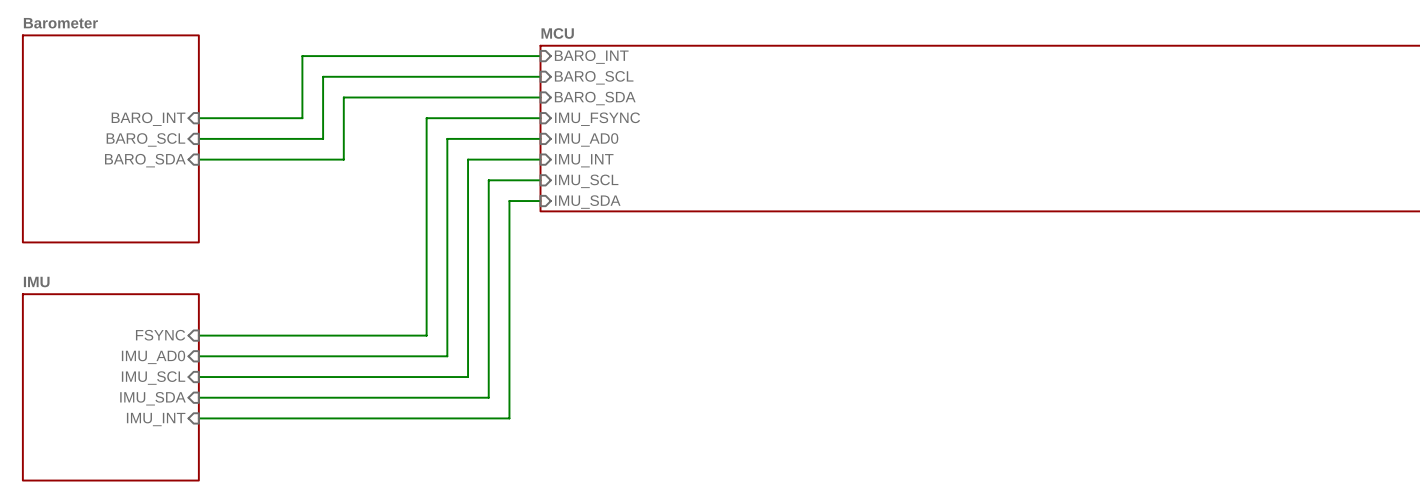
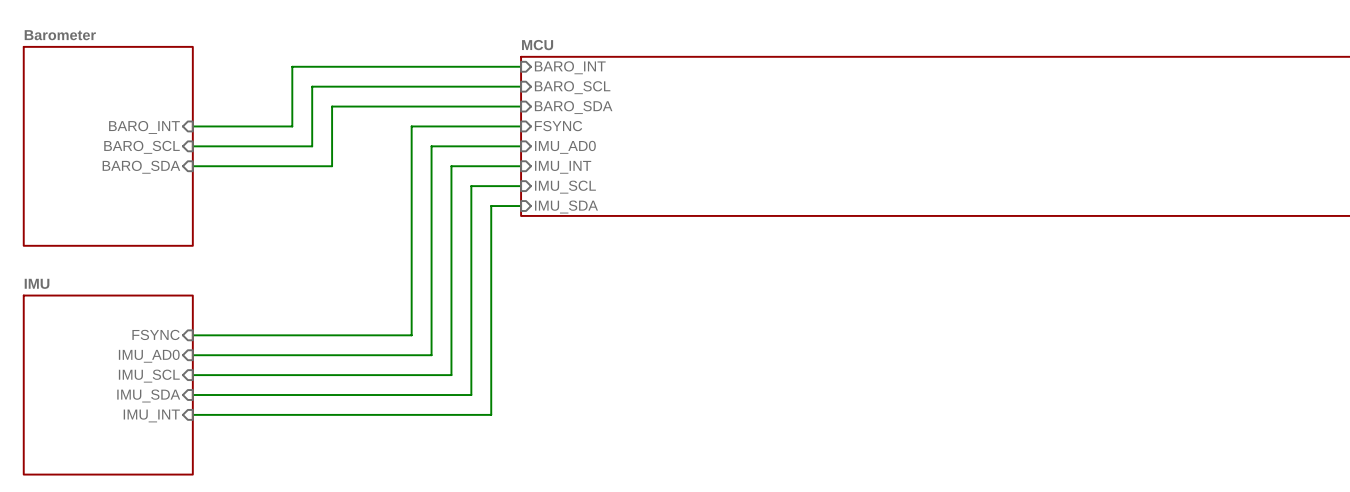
sheet pin: IMU_FSYNC (597, 119) -> FSYNC (558, 126)

